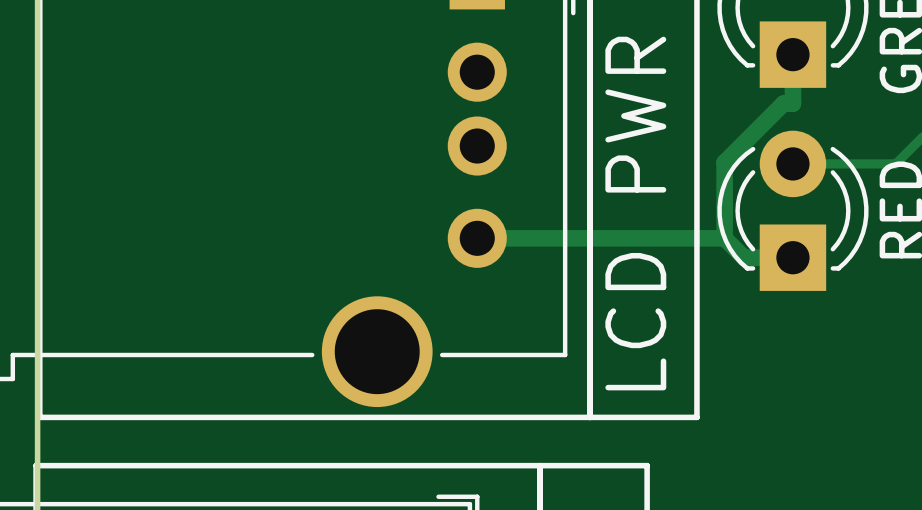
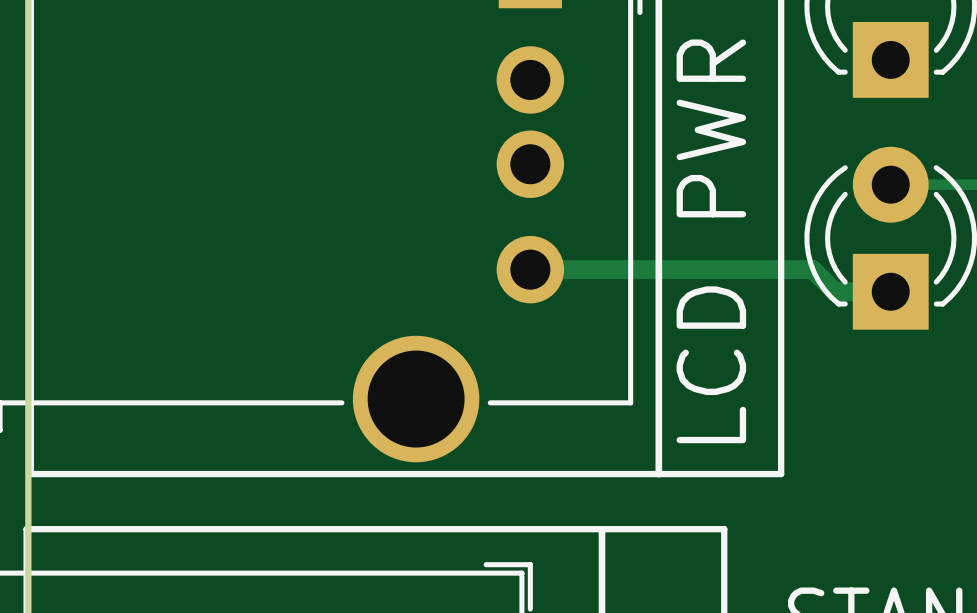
track: (792, 54) (792, 103) (783, 103) (724, 162) (724, 238) -> none

